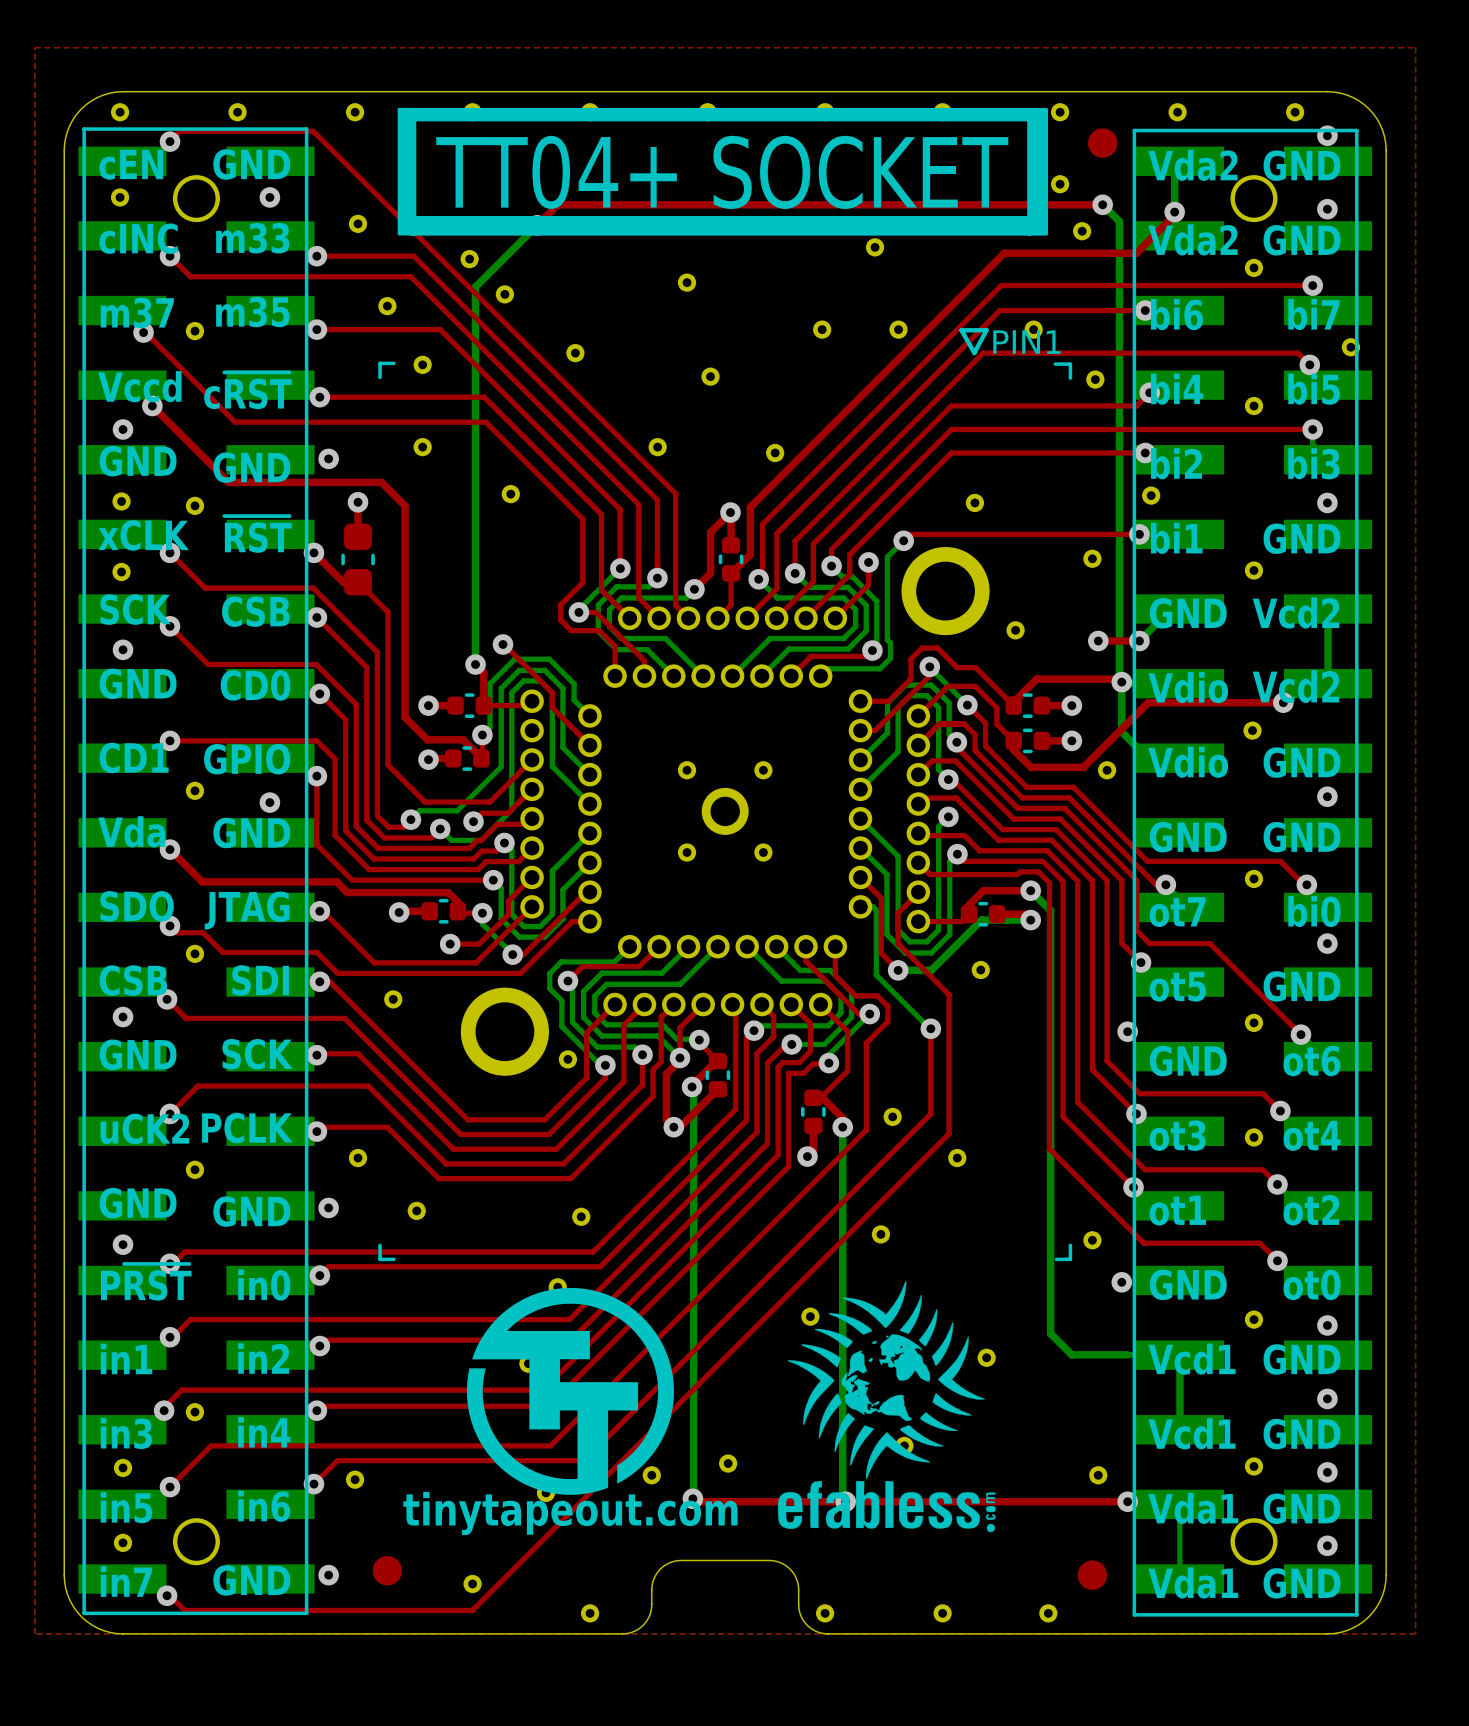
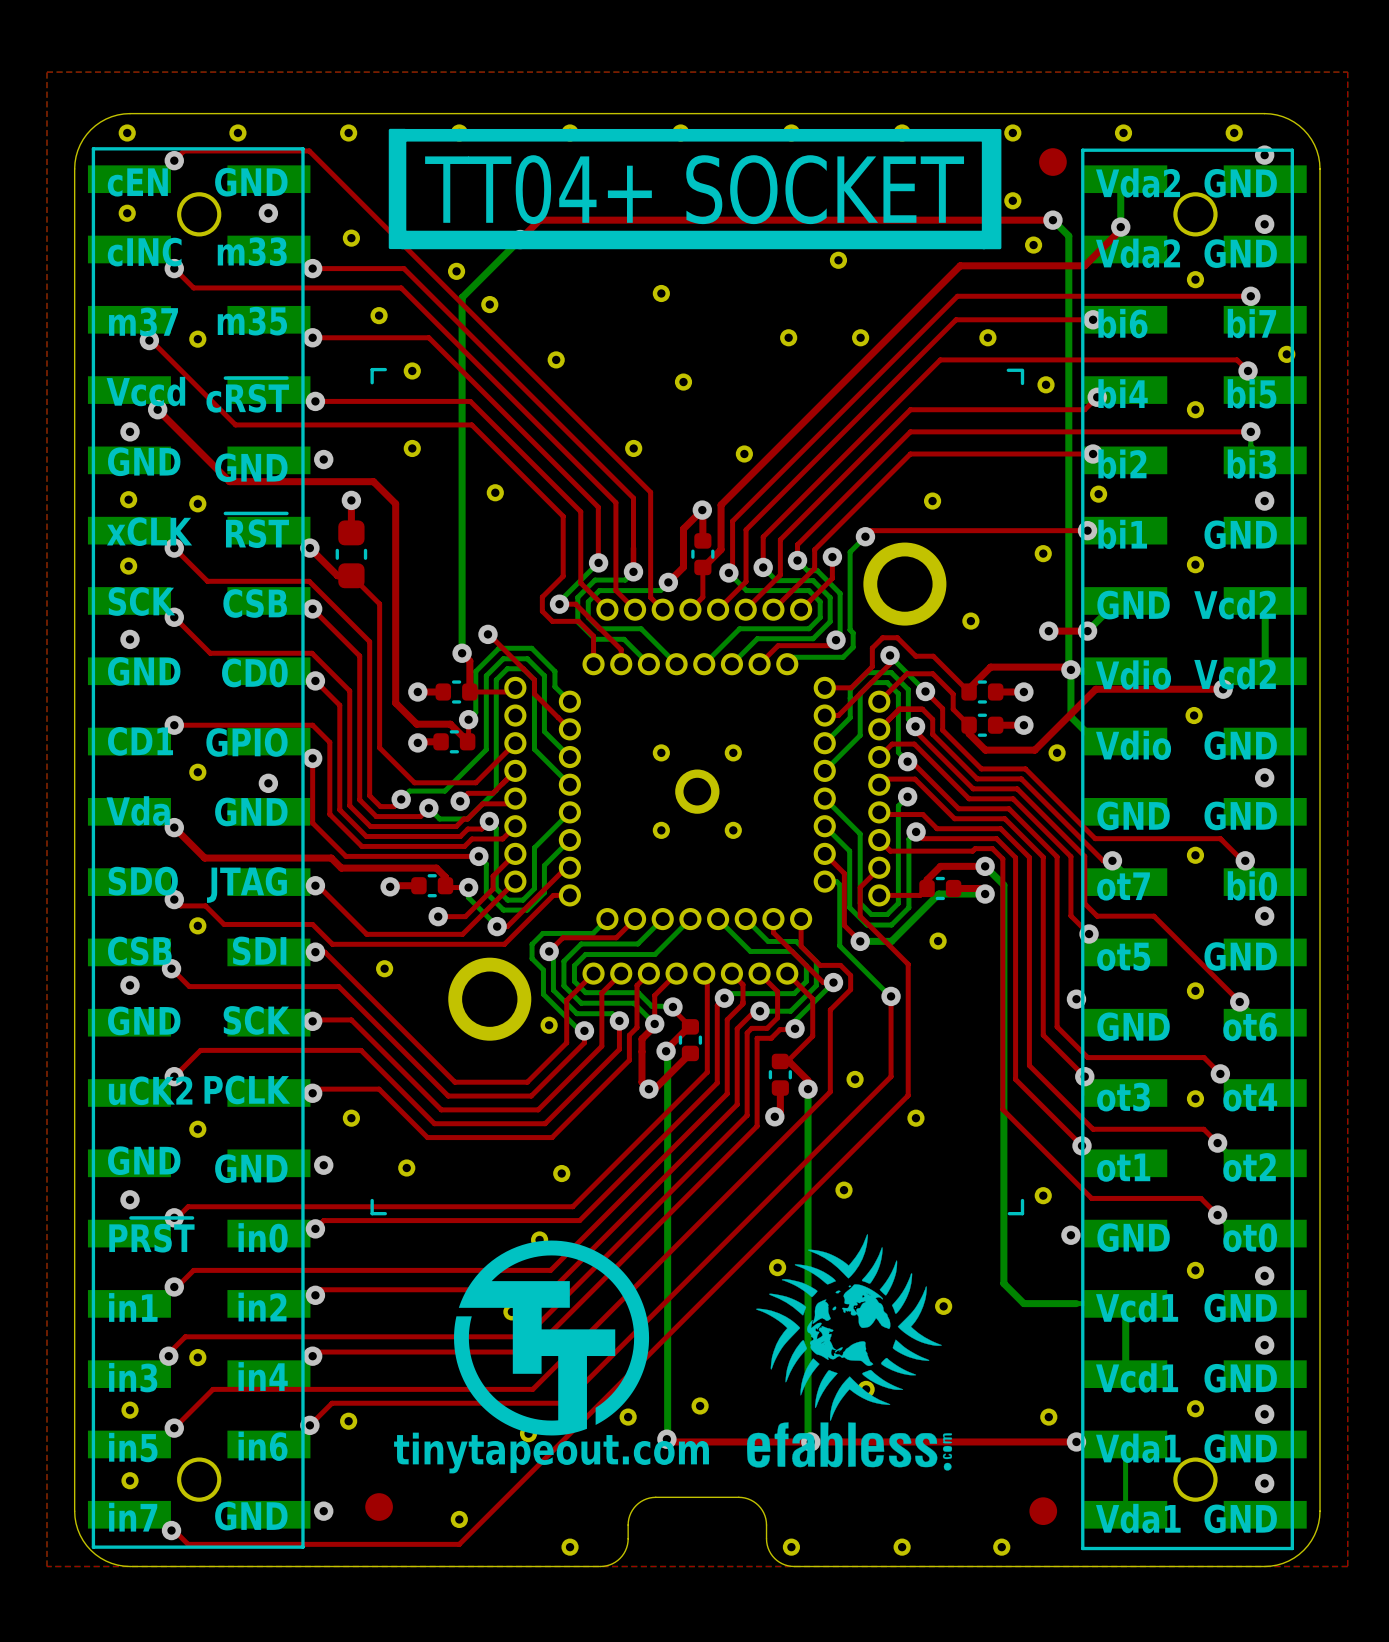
line: (961, 330) (986, 330) (974, 353) (961, 330) -> none
text: PIN1 (1027, 342) -> none

